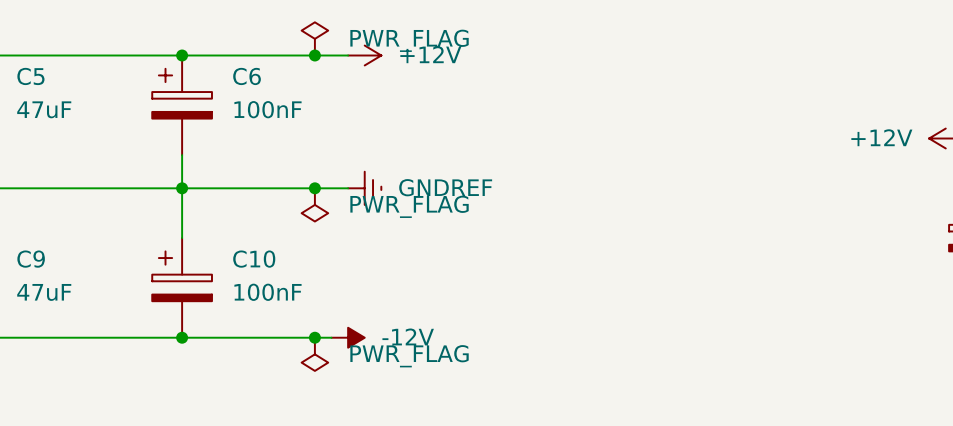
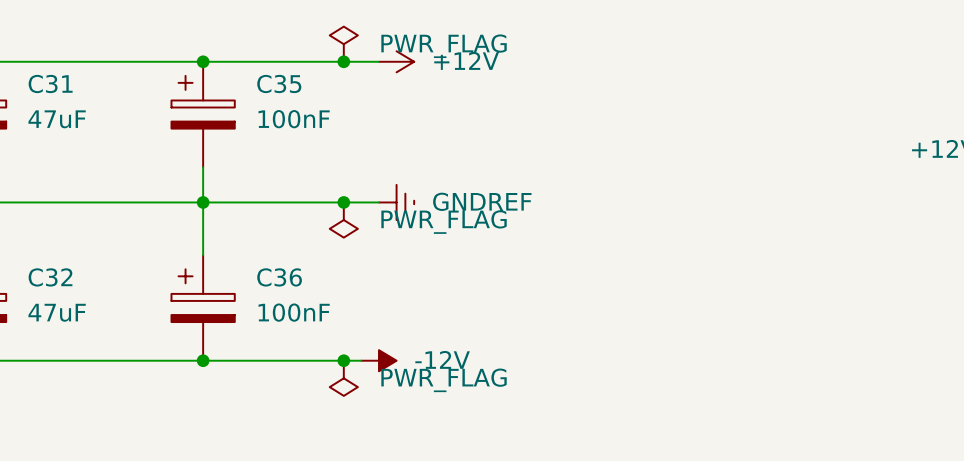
C5 name: C5 (30, 76) -> C31 (50, 83)
C6 name: C6 (247, 76) -> C35 (279, 83)
C9 name: C9 (31, 259) -> C32 (50, 277)
C10 name: C10 (254, 259) -> C36 (279, 277)

